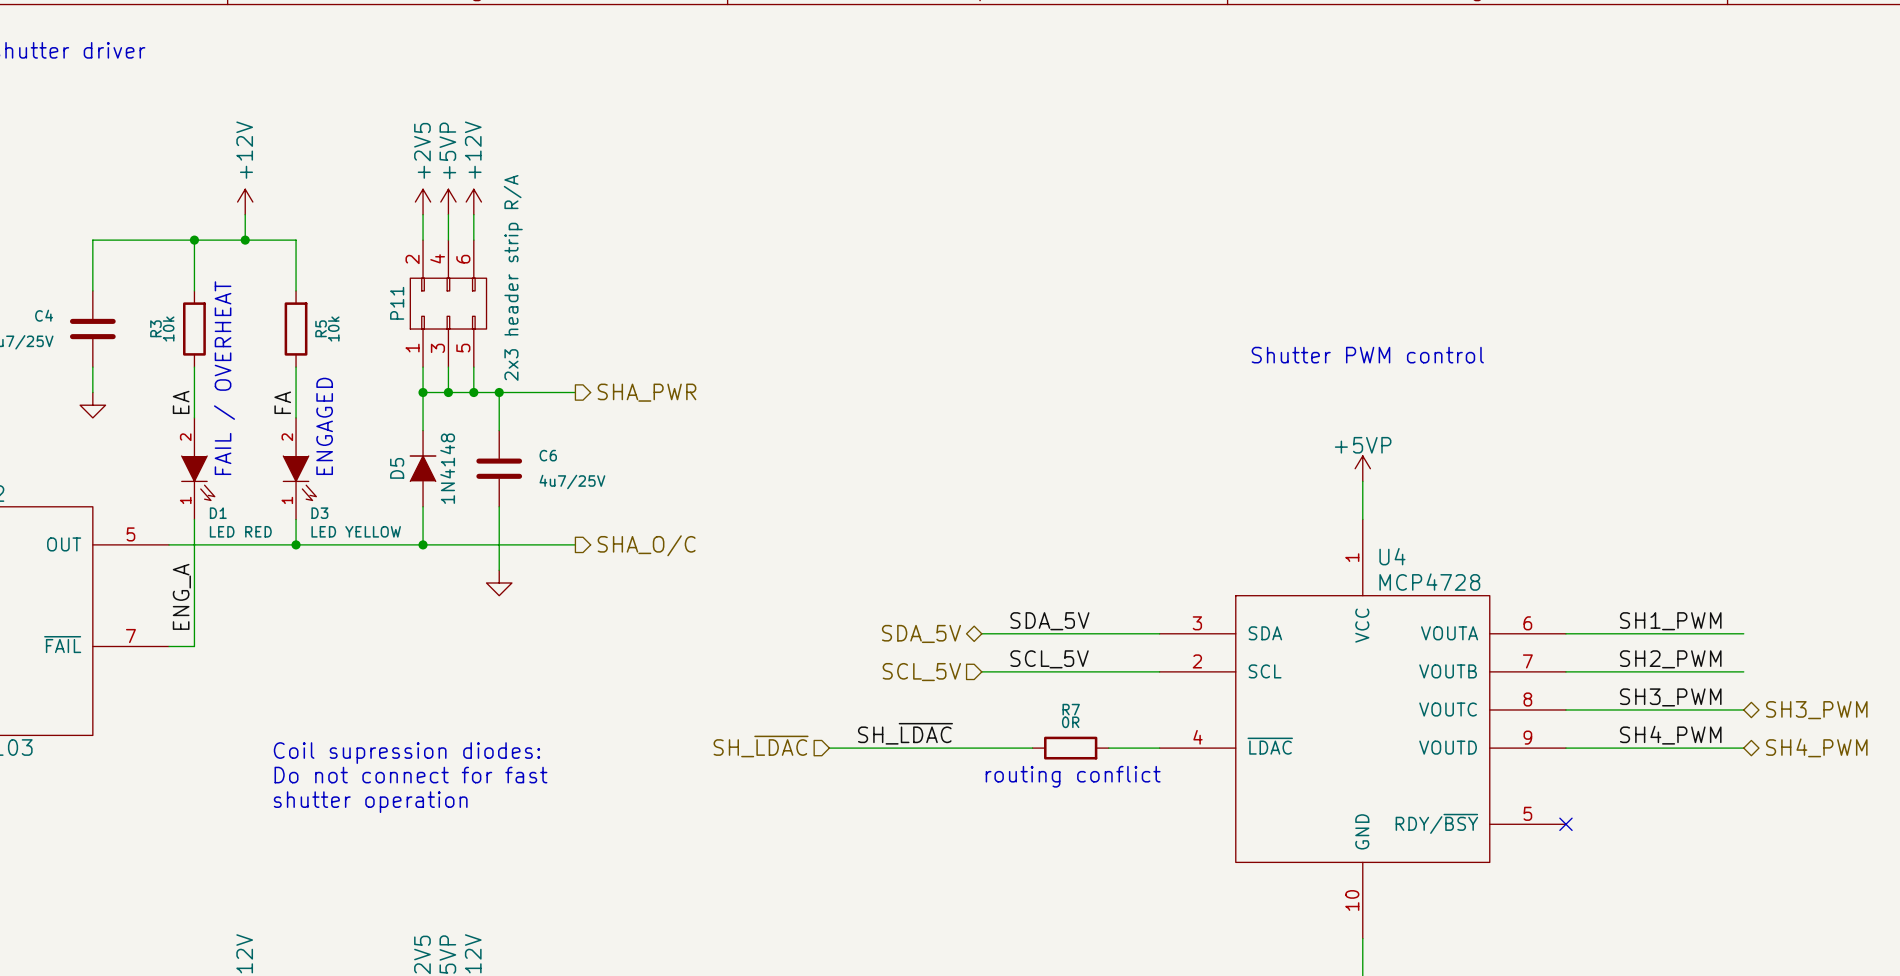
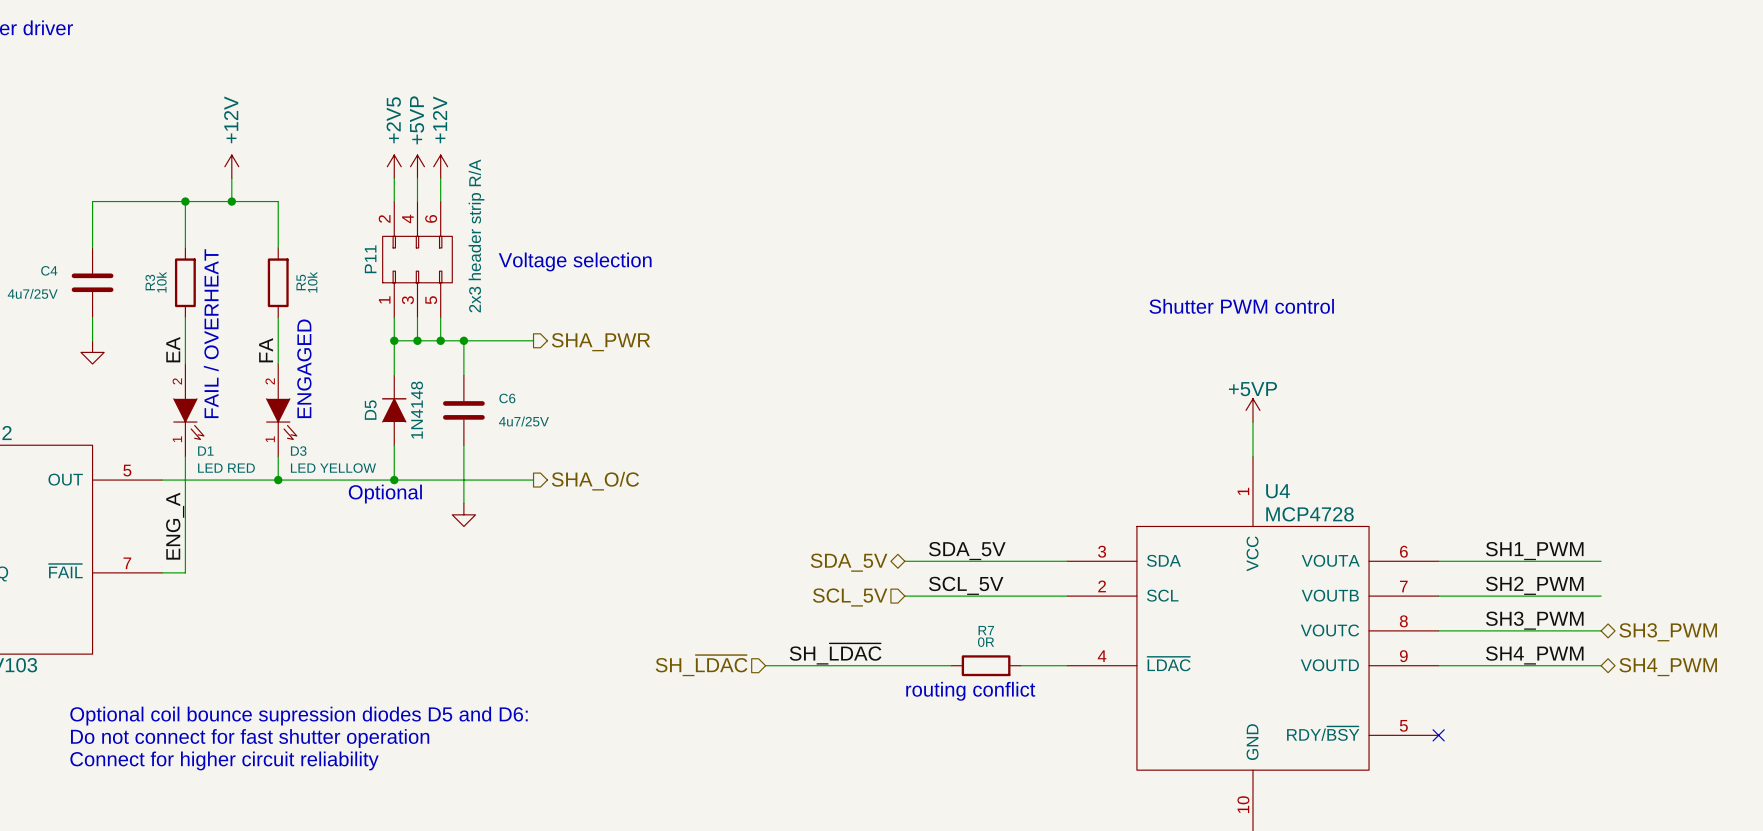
text: none -> Voltage selection (575, 261)
text: none -> Optional (385, 494)
text: Coil supression diodes: (406, 753) -> none
text: Do not connect for fast (410, 775) -> none
text: shutter operation (370, 802) -> none
text: none -> Optional coil bounce supression diodes D5 and D6: (299, 716)
text: none -> Do not connect for fast shutter operation (250, 738)
text: none -> Connect for higher circuit reliability (224, 760)

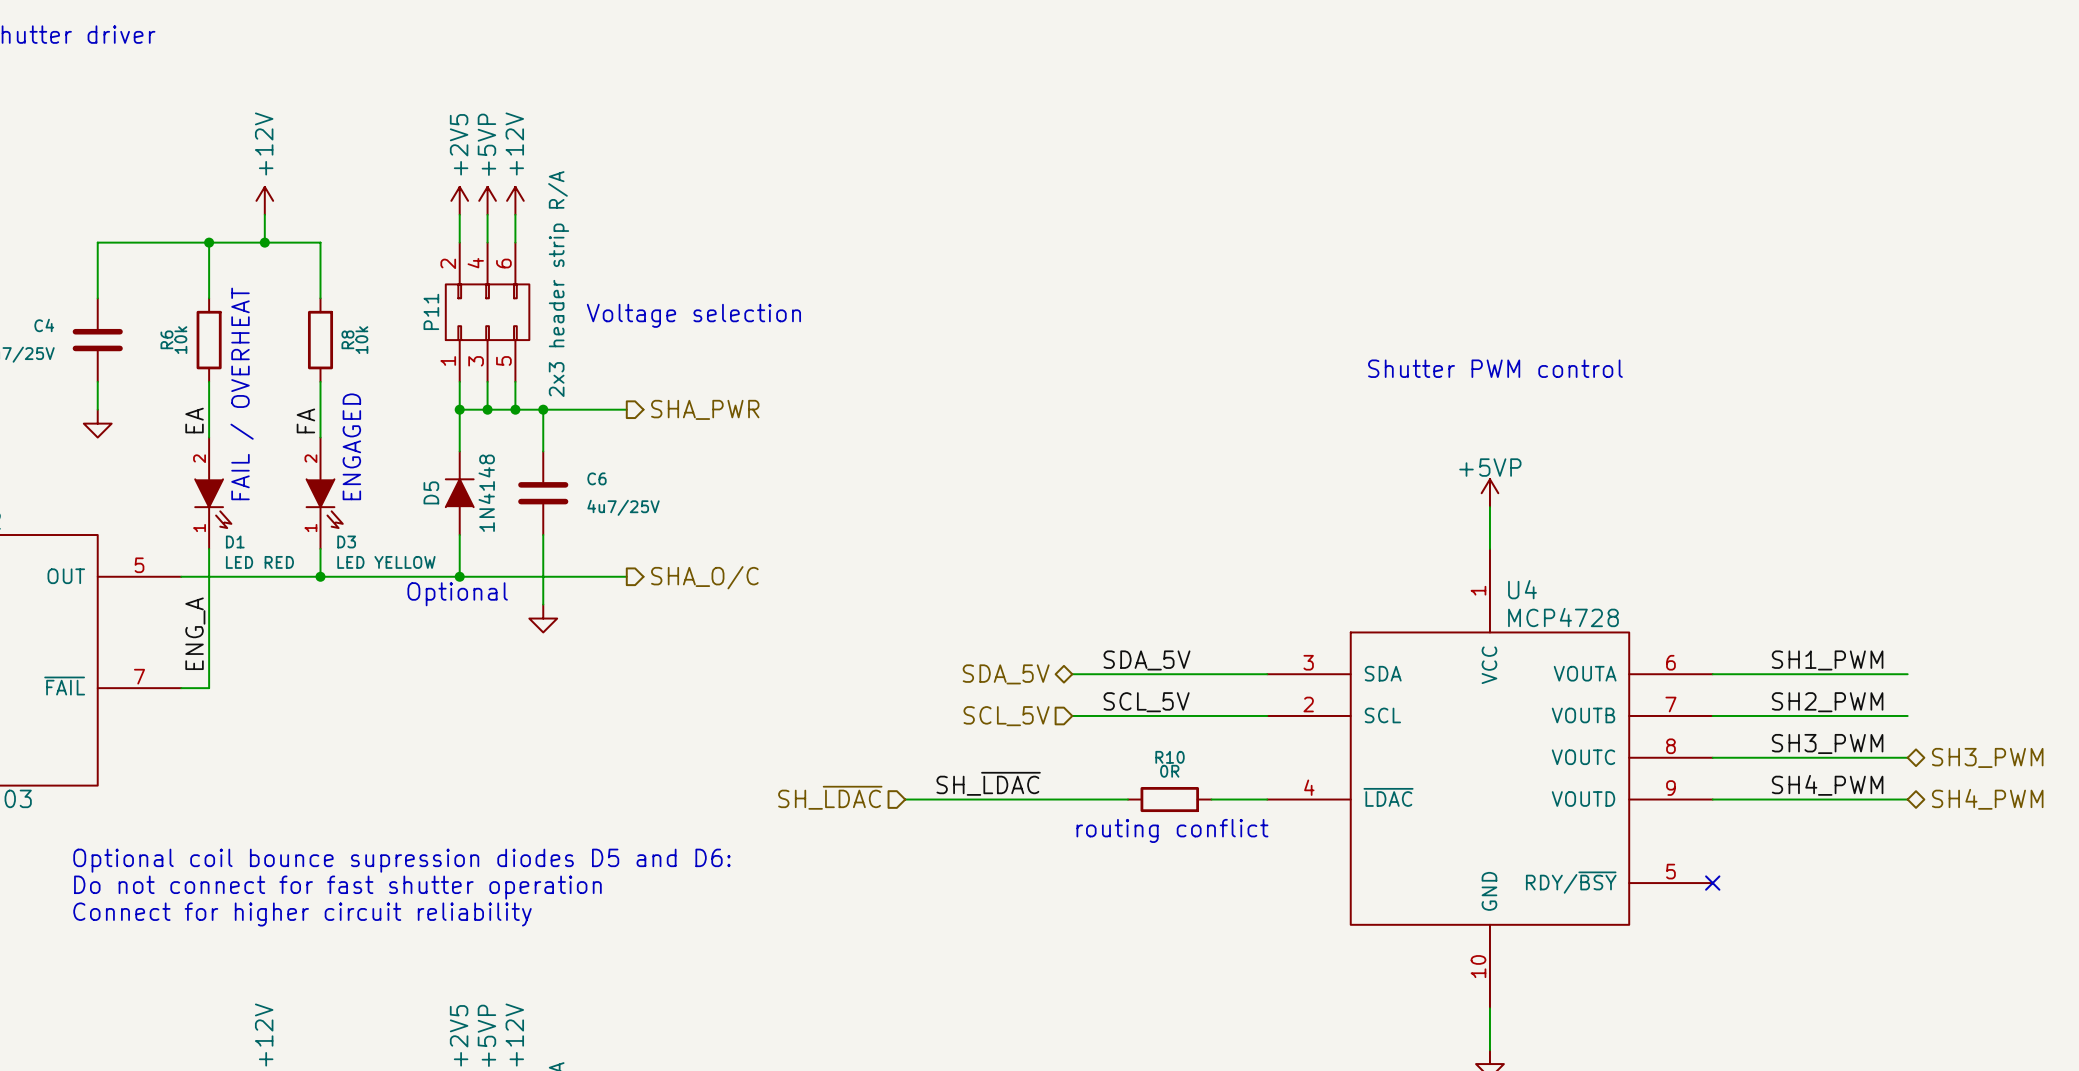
R3 name: R3 (150, 282) -> R6 (166, 339)
R5 name: R5 (301, 282) -> R8 (347, 339)
R7 name: R7 (986, 630) -> R10 (1170, 757)

